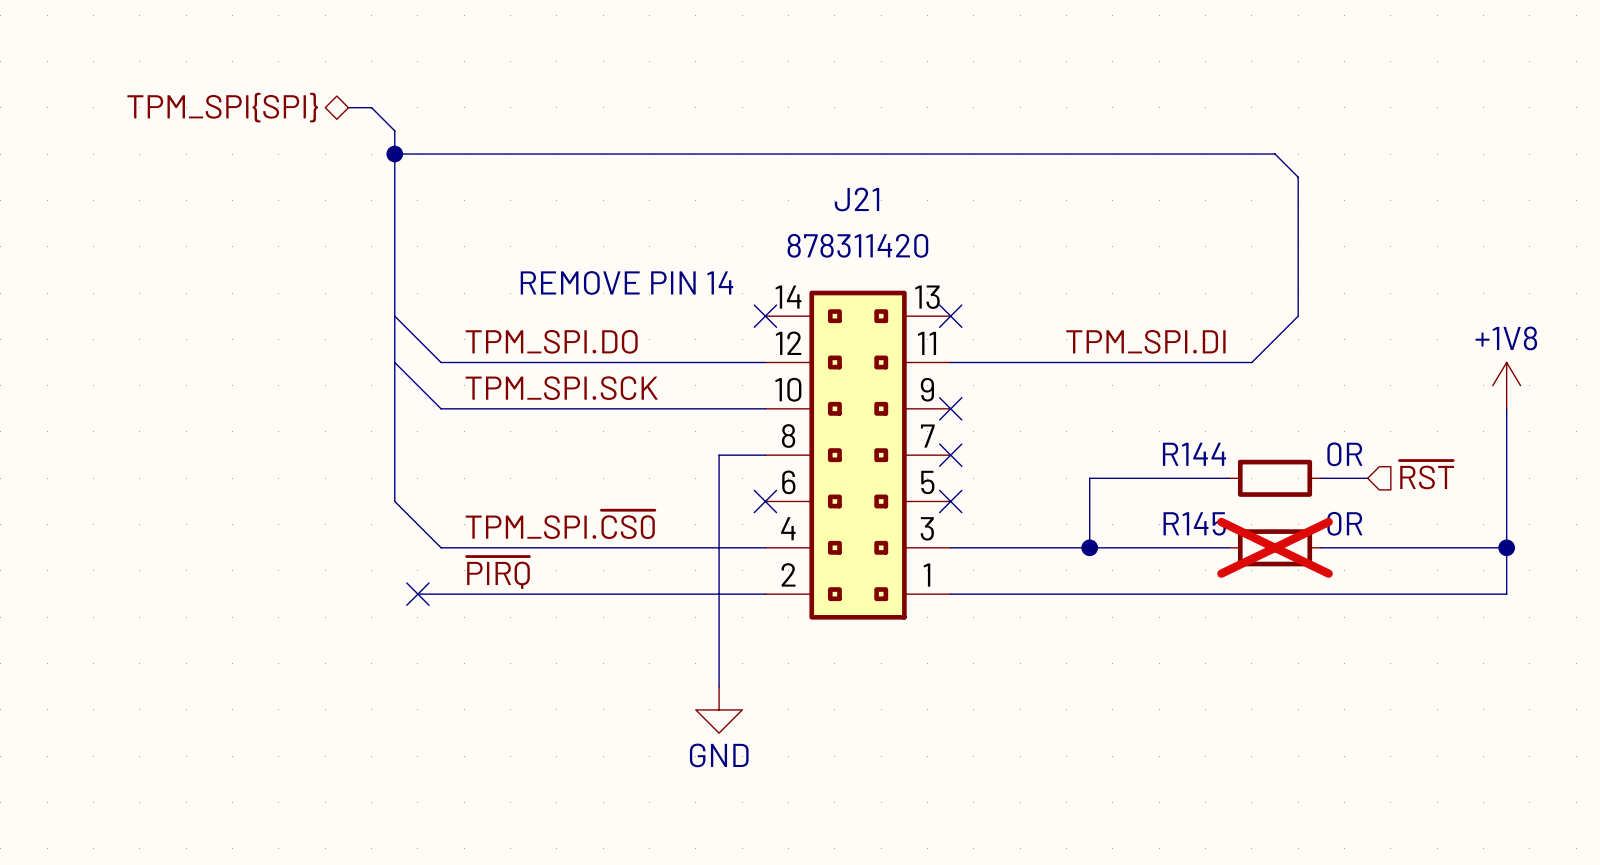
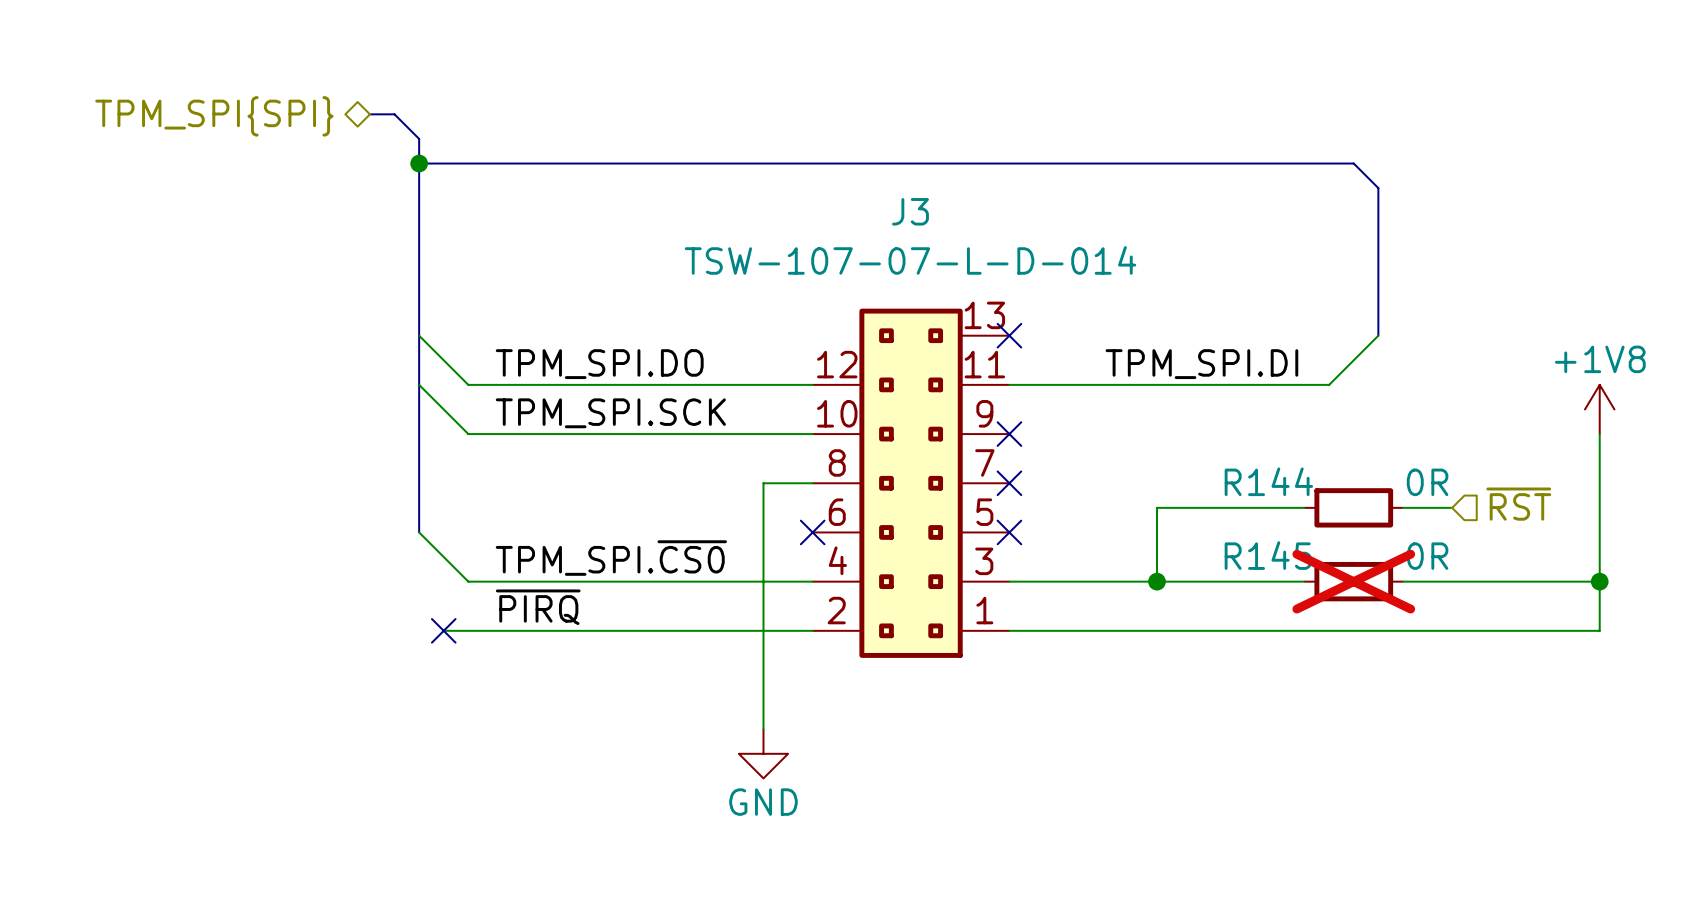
text: REMOVE PIN 14 (626, 282) -> none
no-connect mark: (765, 316) -> none
J21: (858, 455) -> none
J3: none -> (911, 483)

